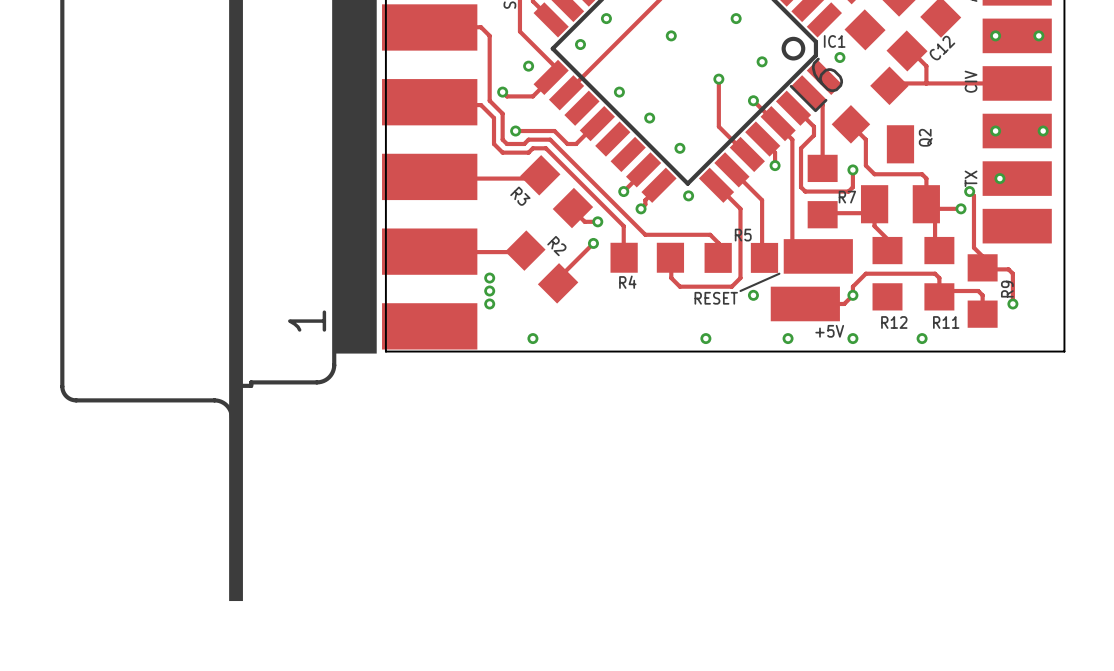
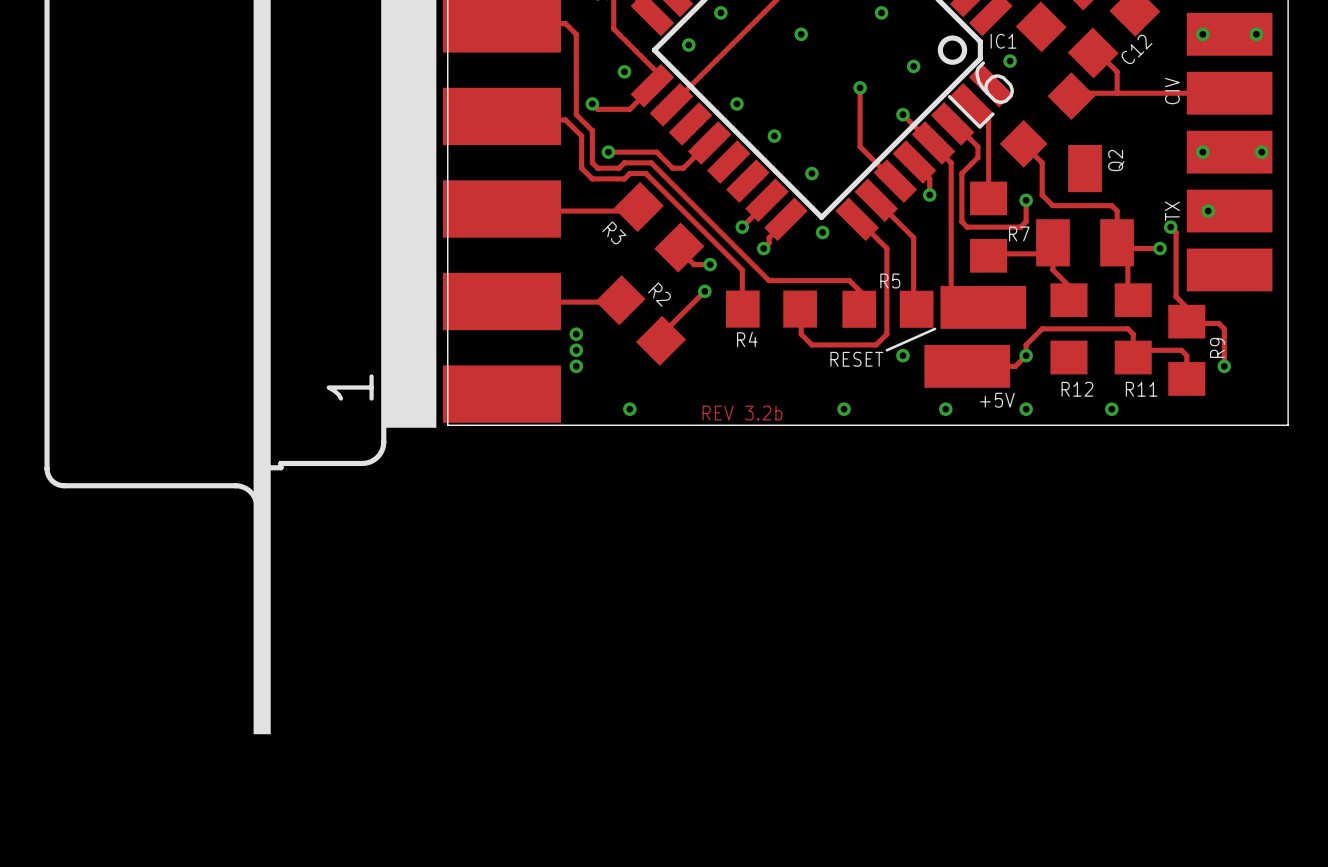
text: none -> REV 3.2b (742, 413)

